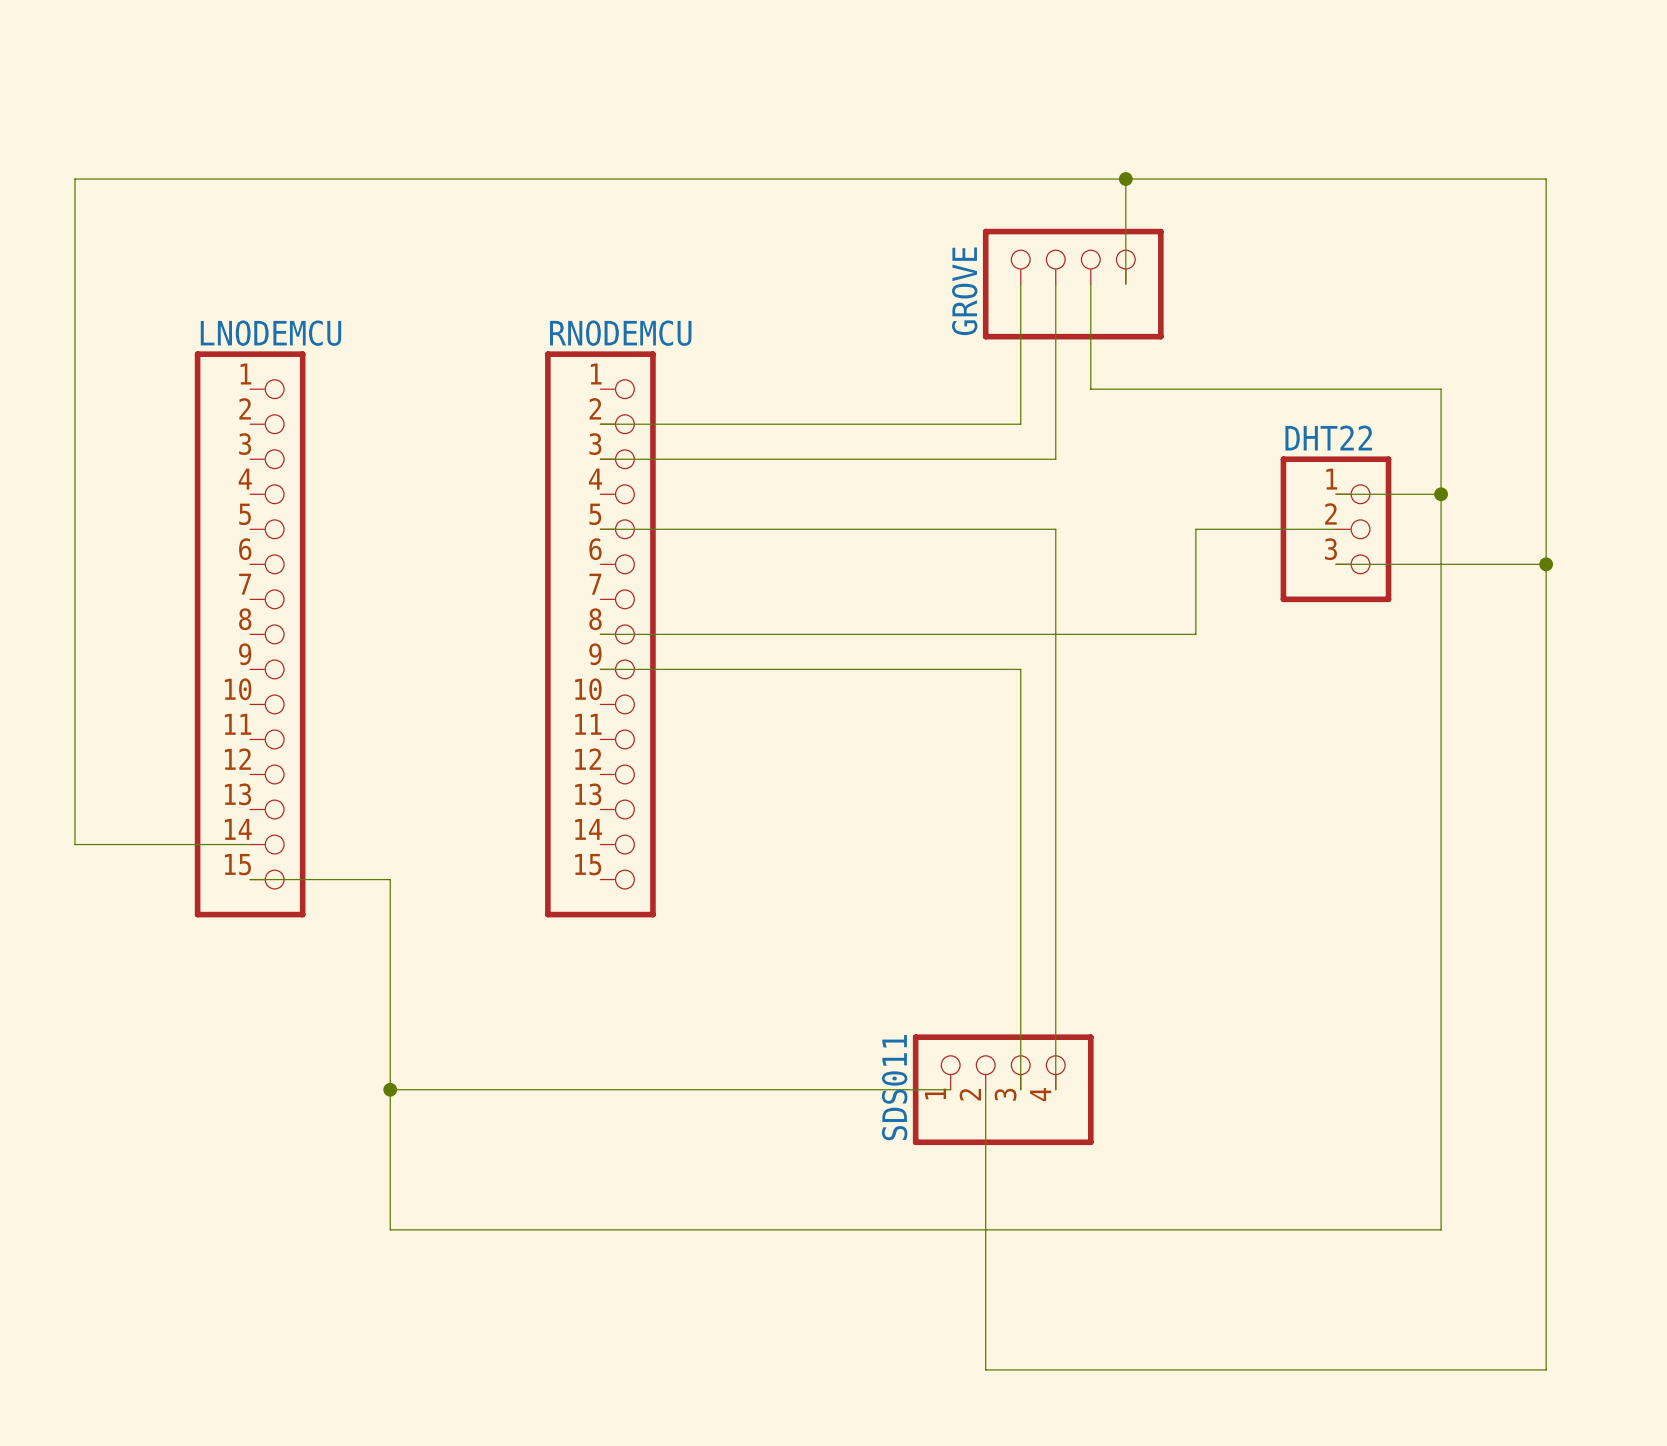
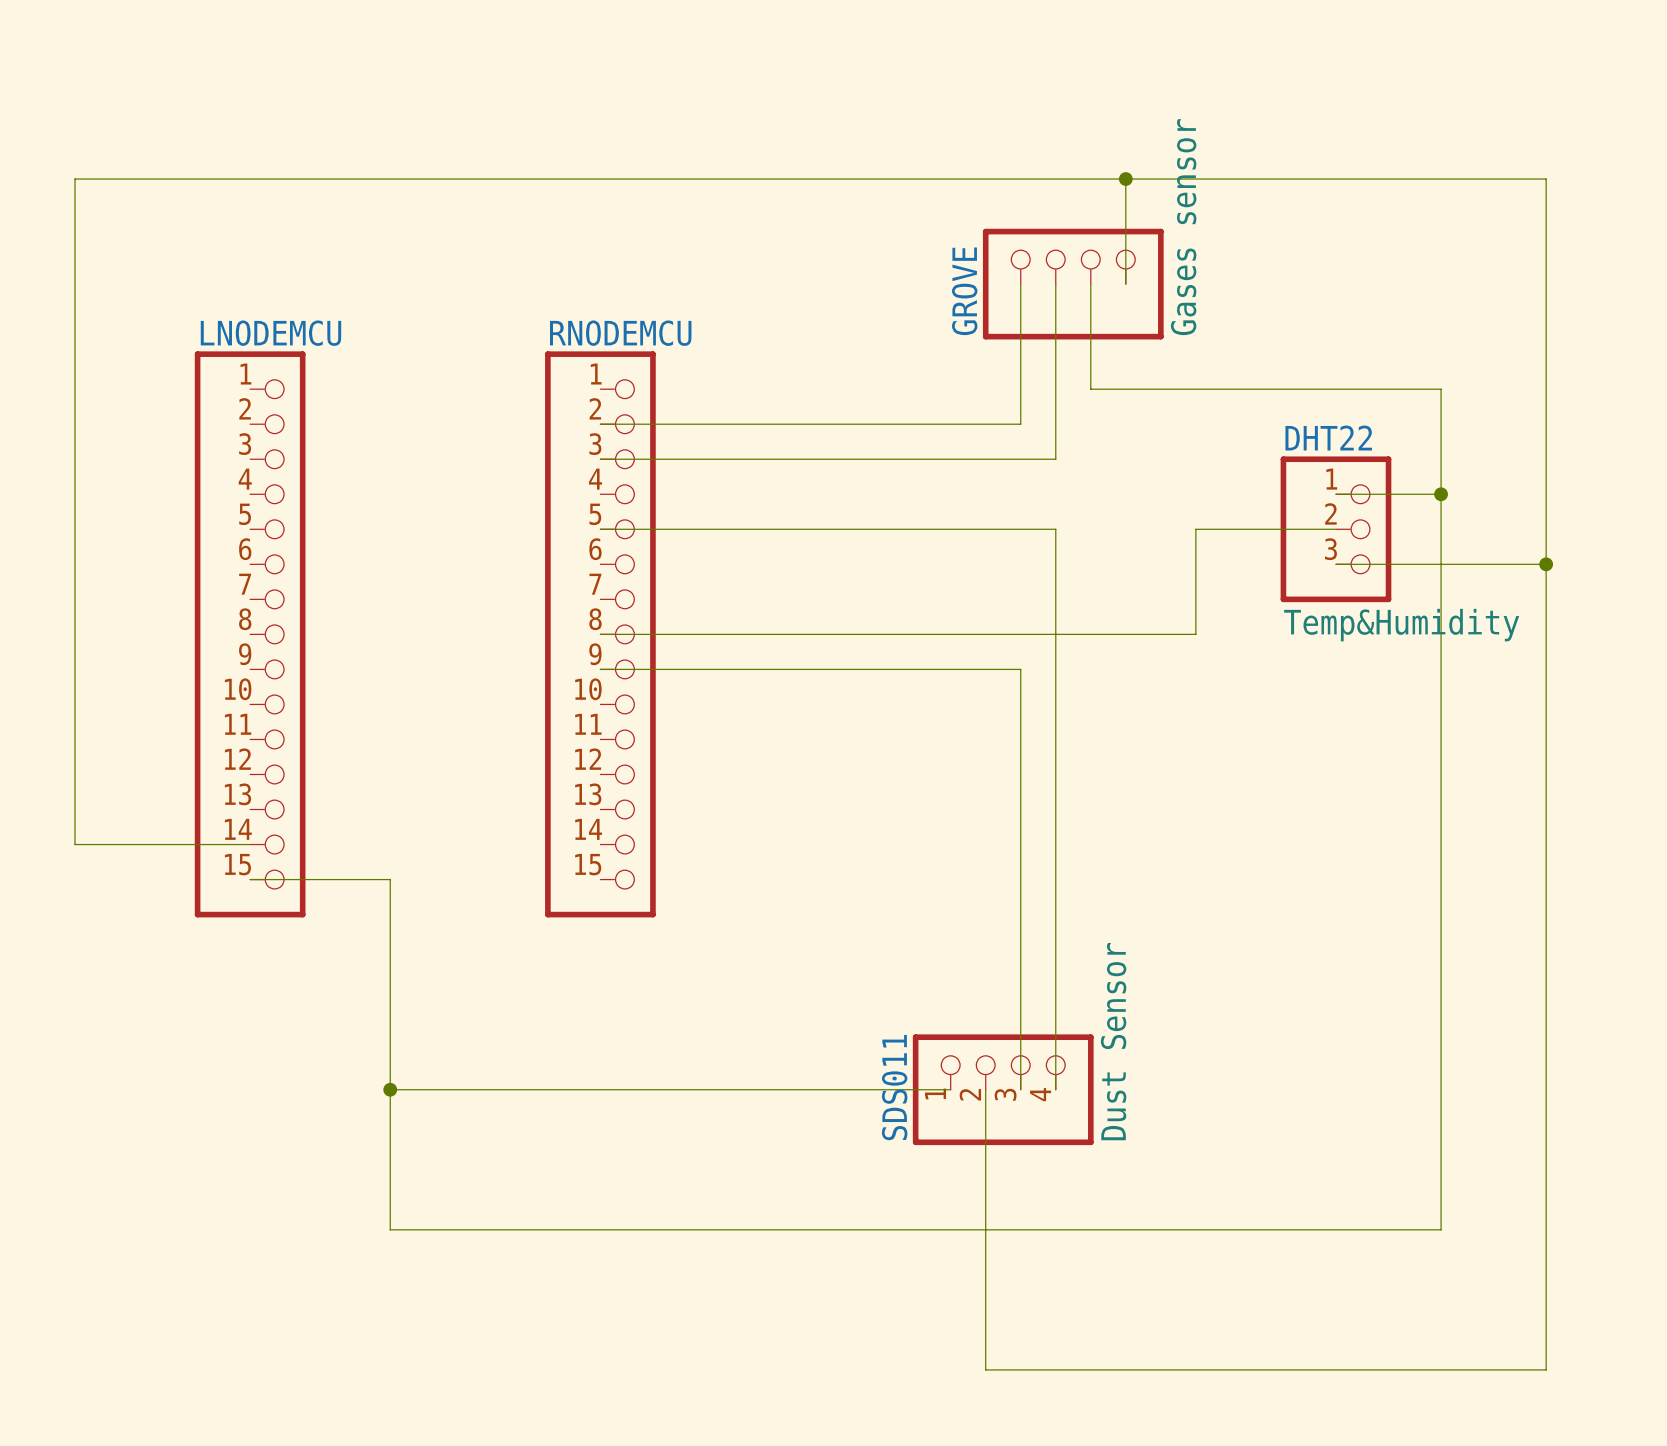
GROVE value: none -> Gases sensor (1183, 227)
DHT22 value: none -> Temp&Humidity (1401, 625)
SDS011 value: none -> Dust Sensor (1113, 1041)

